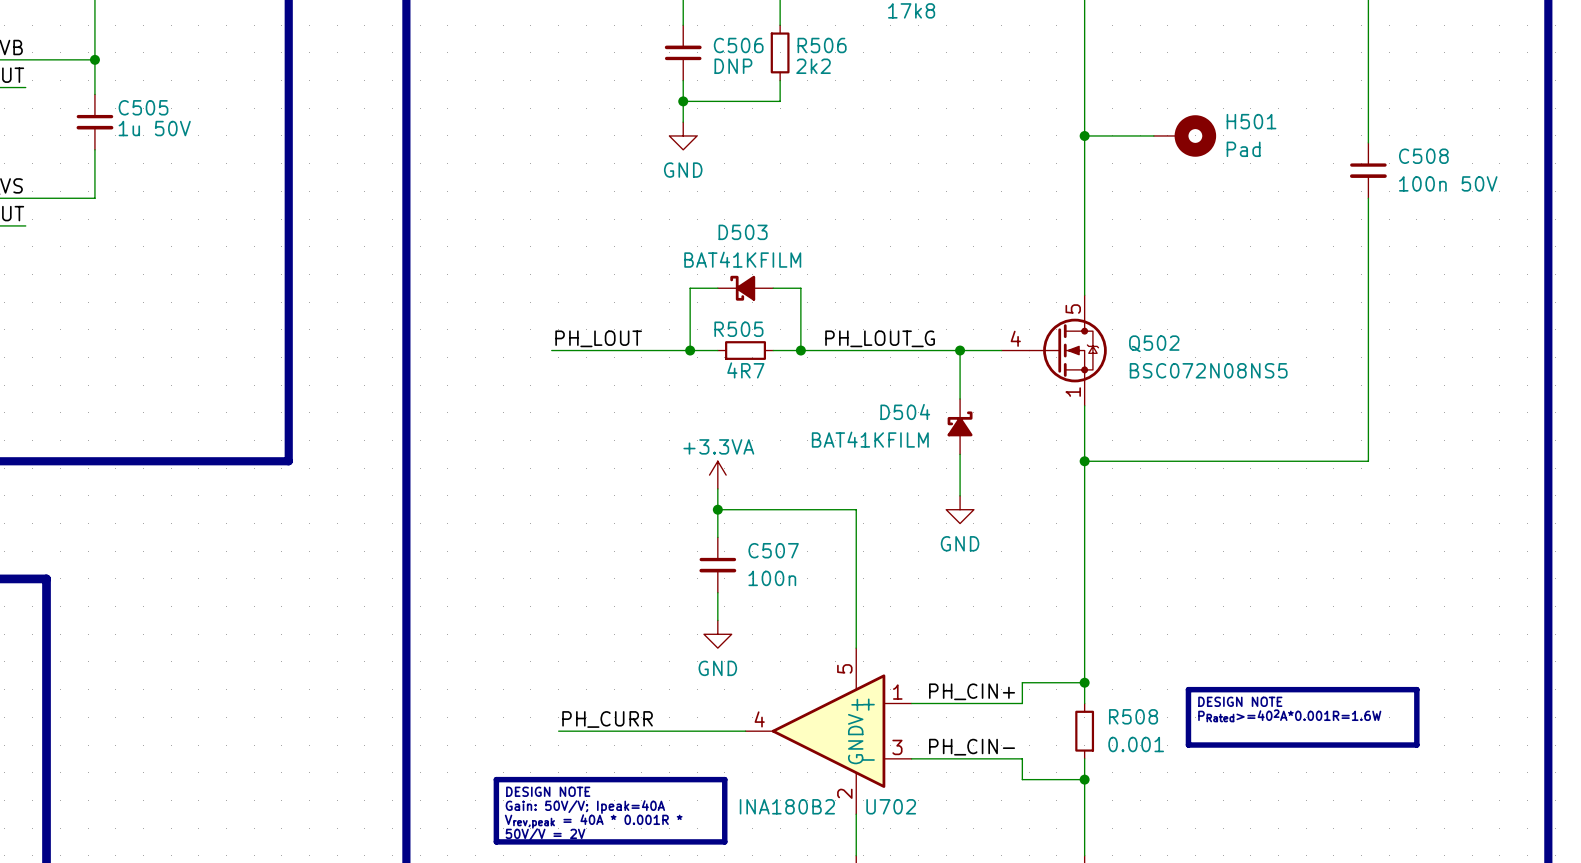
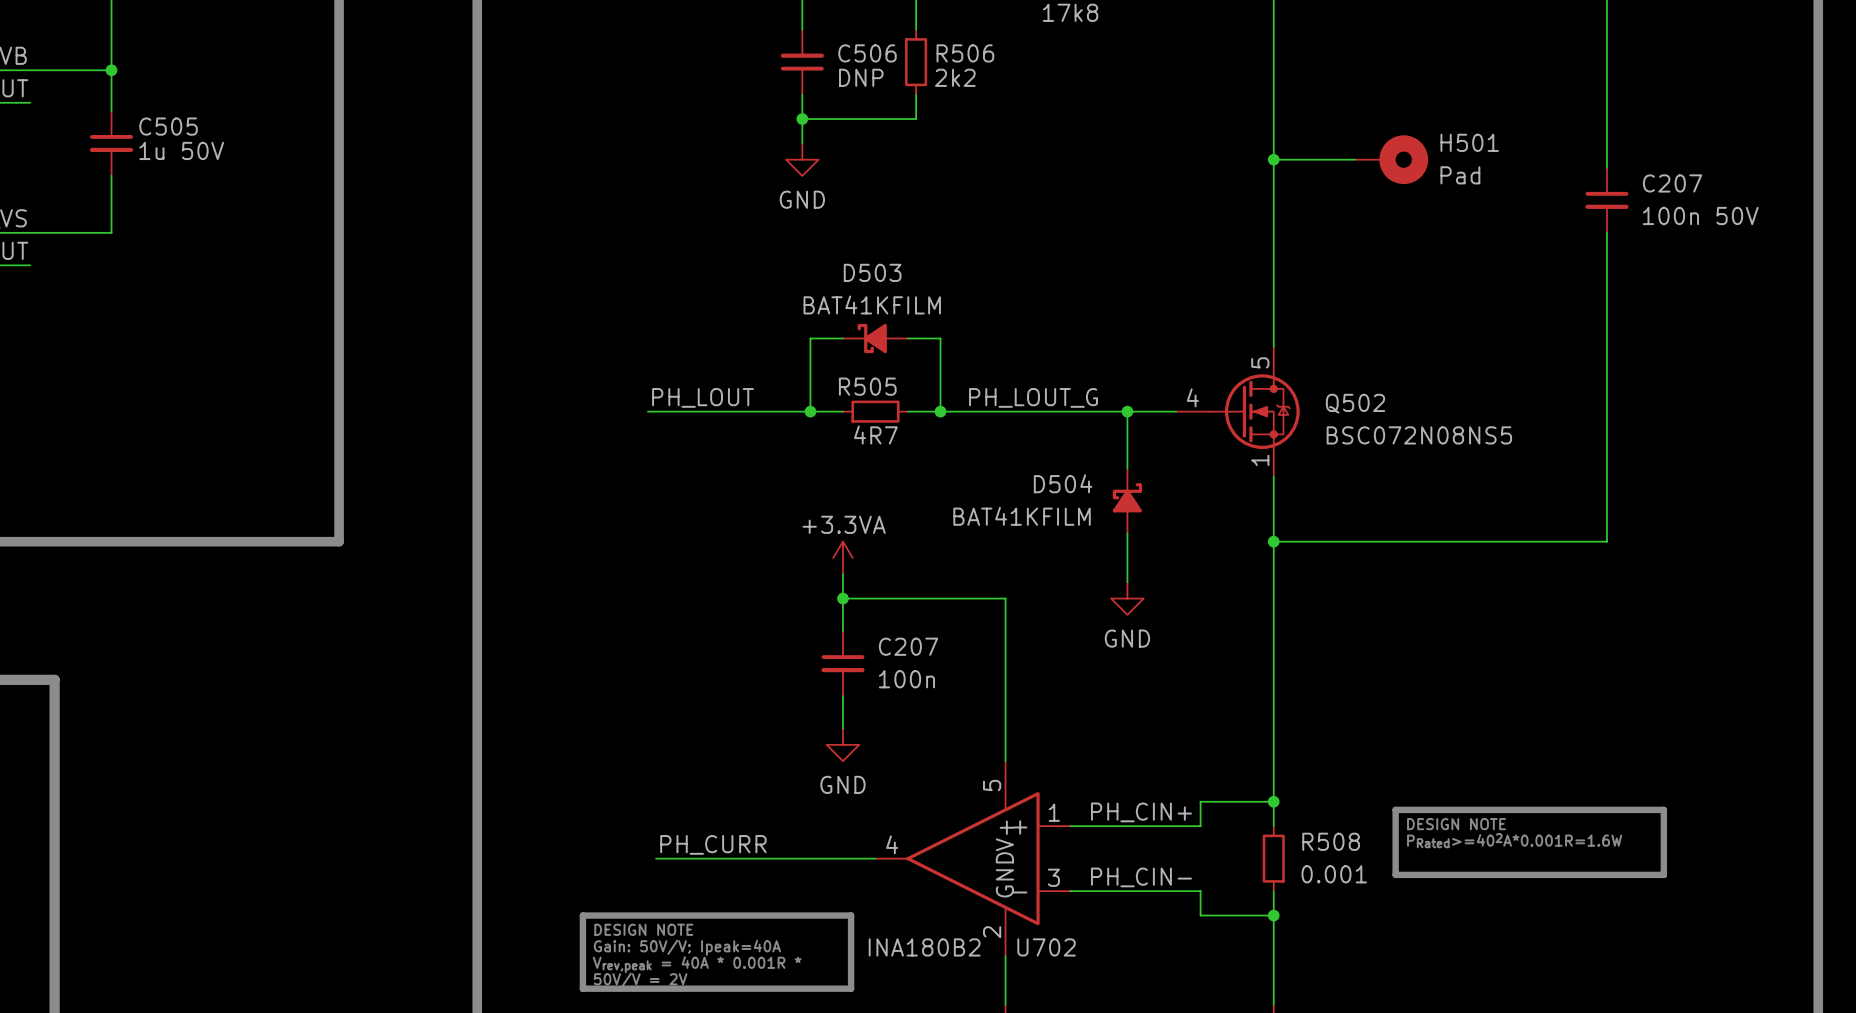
C508 name: C508 (1423, 156) -> C207 (1672, 183)
C507 name: C507 (773, 550) -> C207 (908, 646)

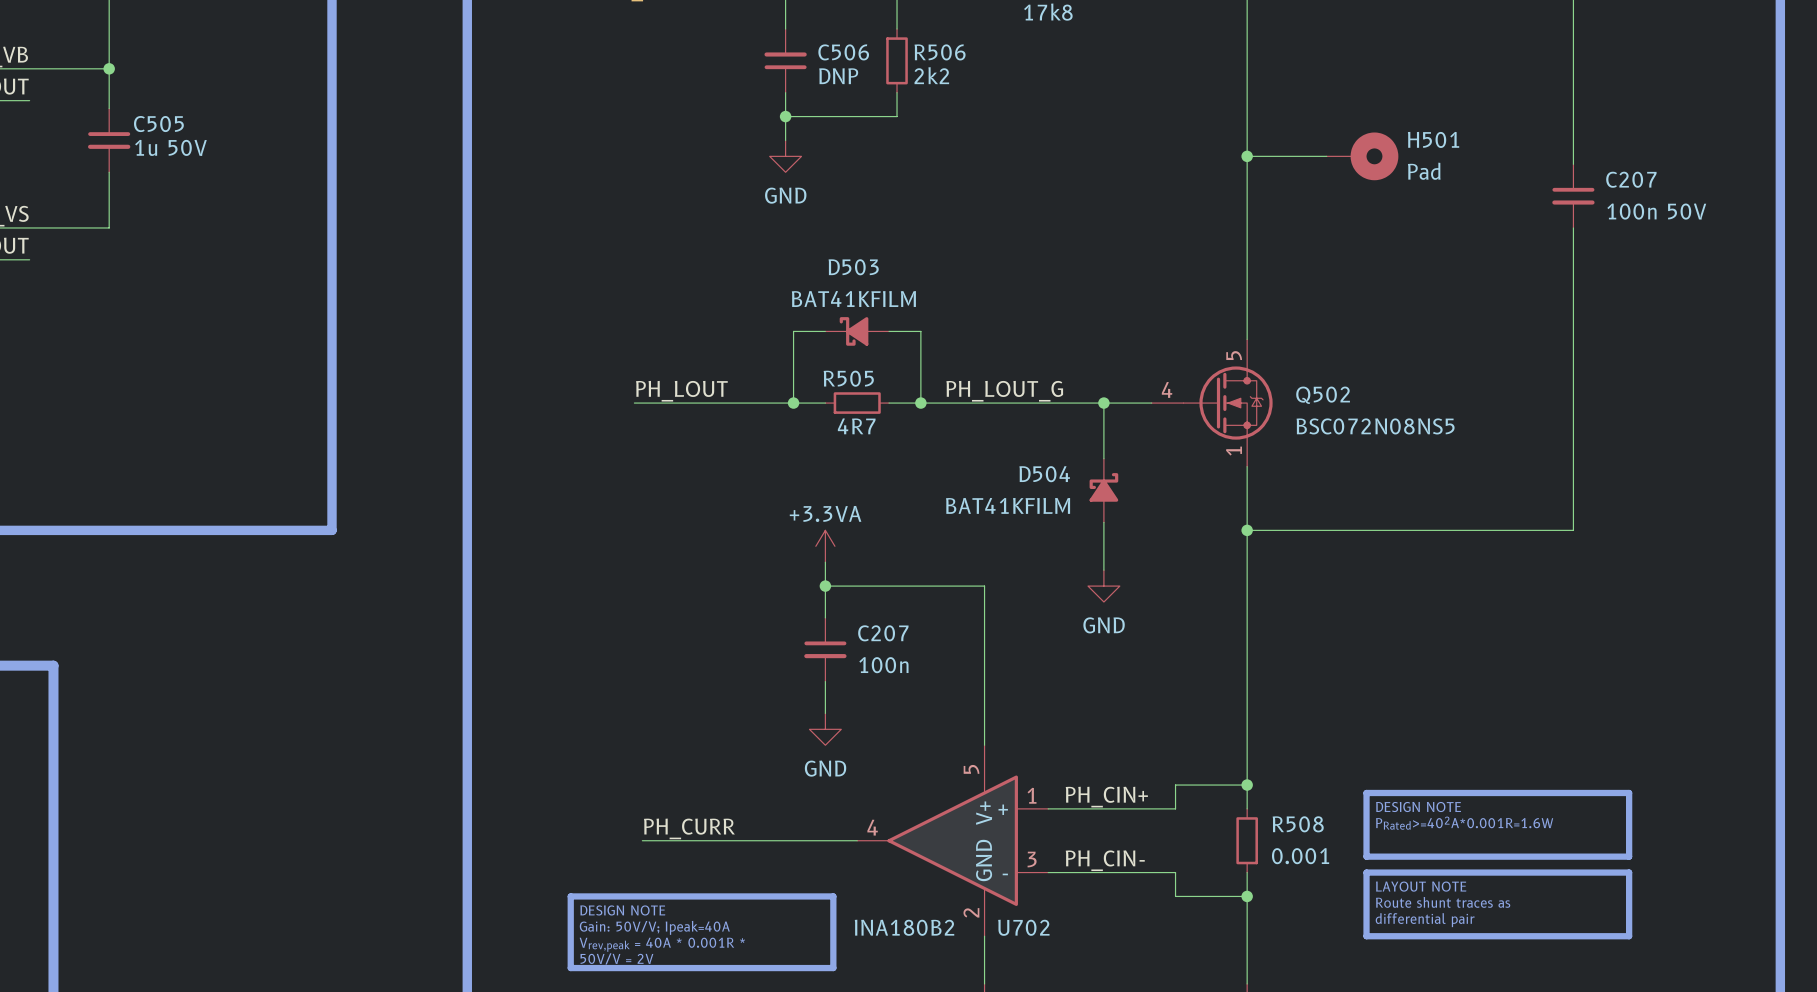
line: none -> (1366, 872) (1629, 872) (1629, 936) (1366, 936) (1366, 872)
text: none -> LAYOUT NOTE (1421, 886)
text: none -> Route shunt traces as (1443, 902)
text: none -> differential pair (1425, 920)

